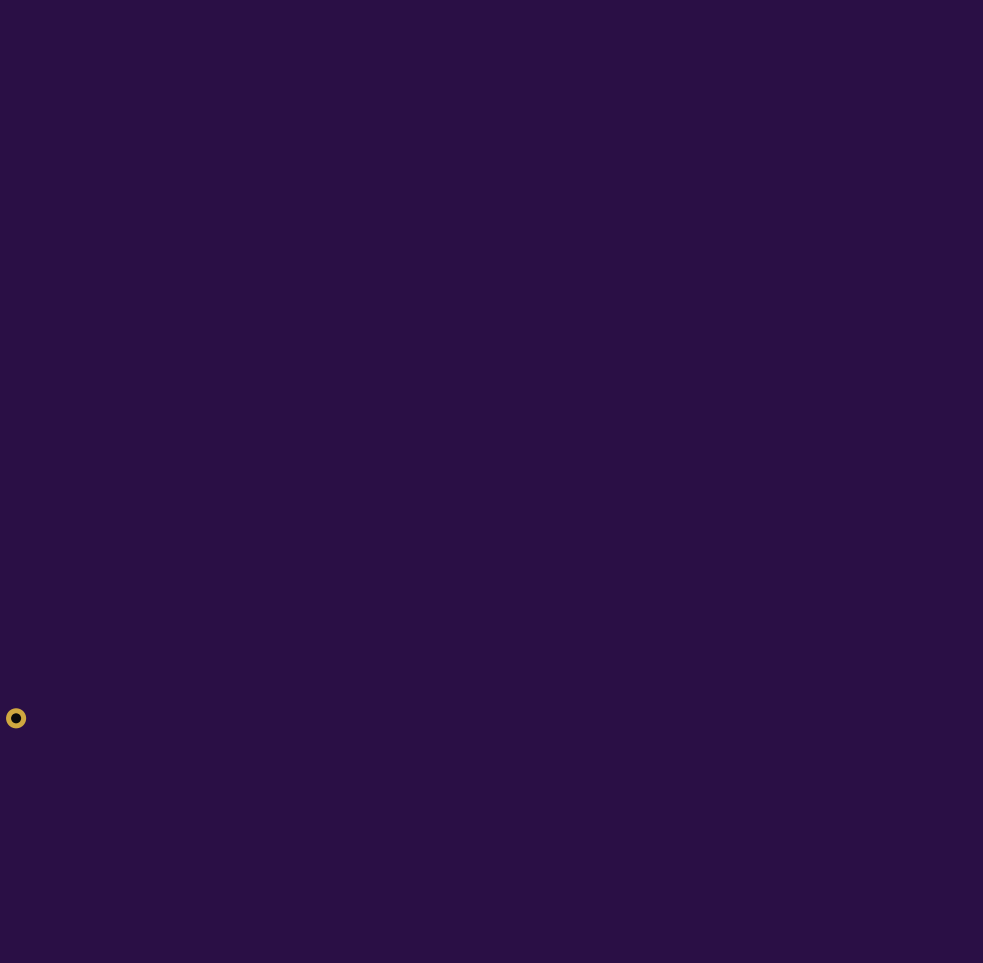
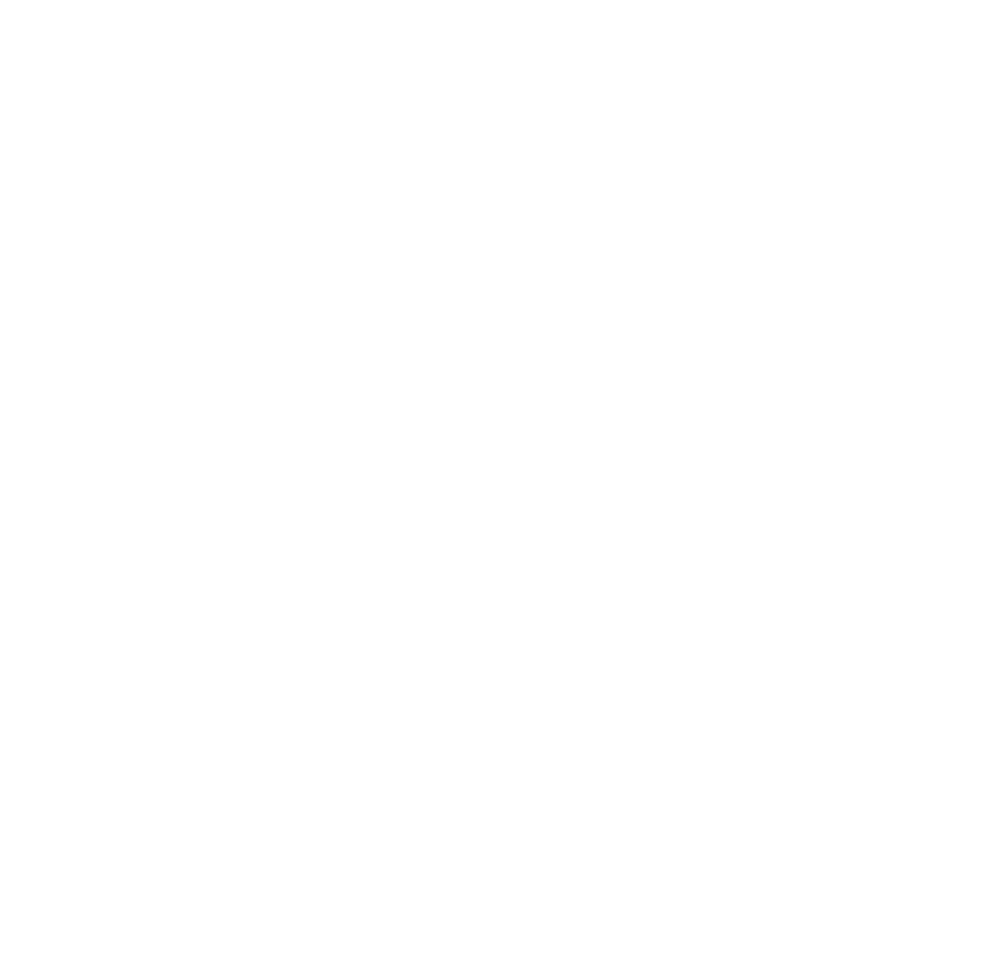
via: (16, 718) -> none

